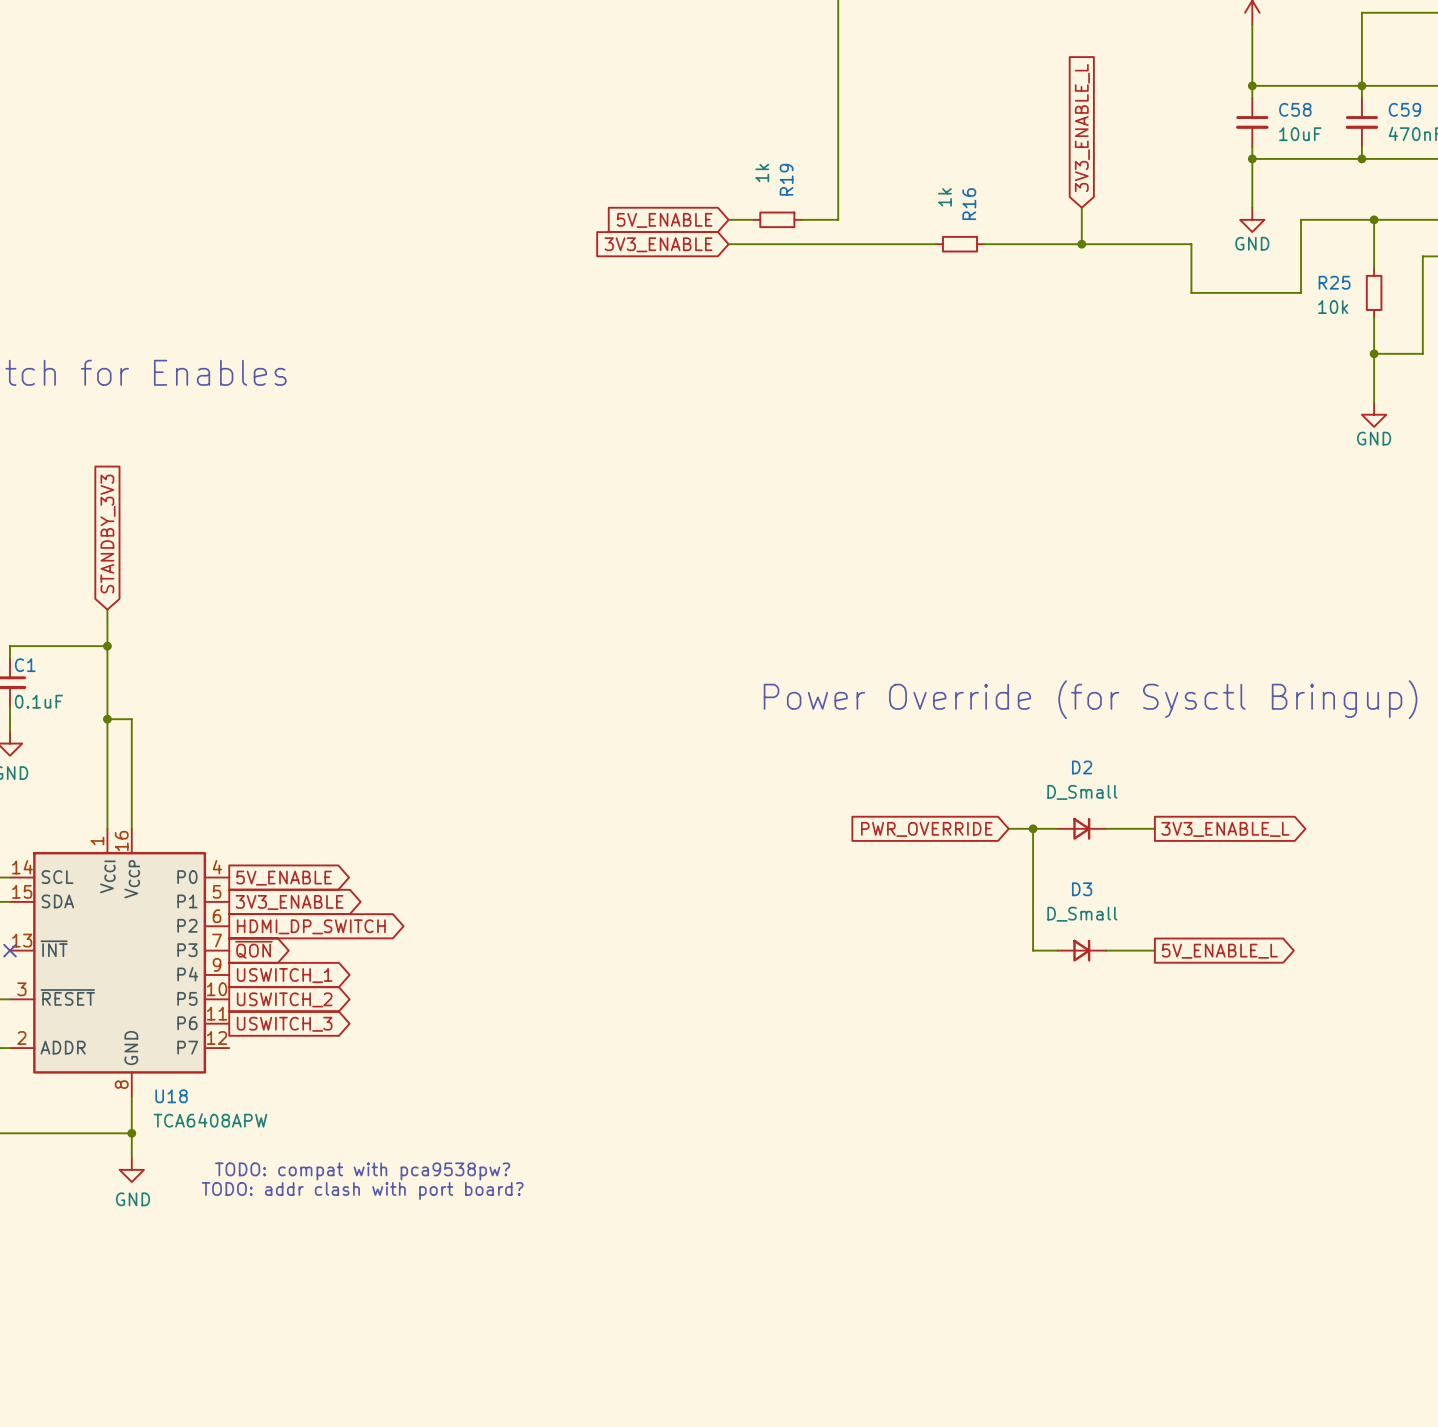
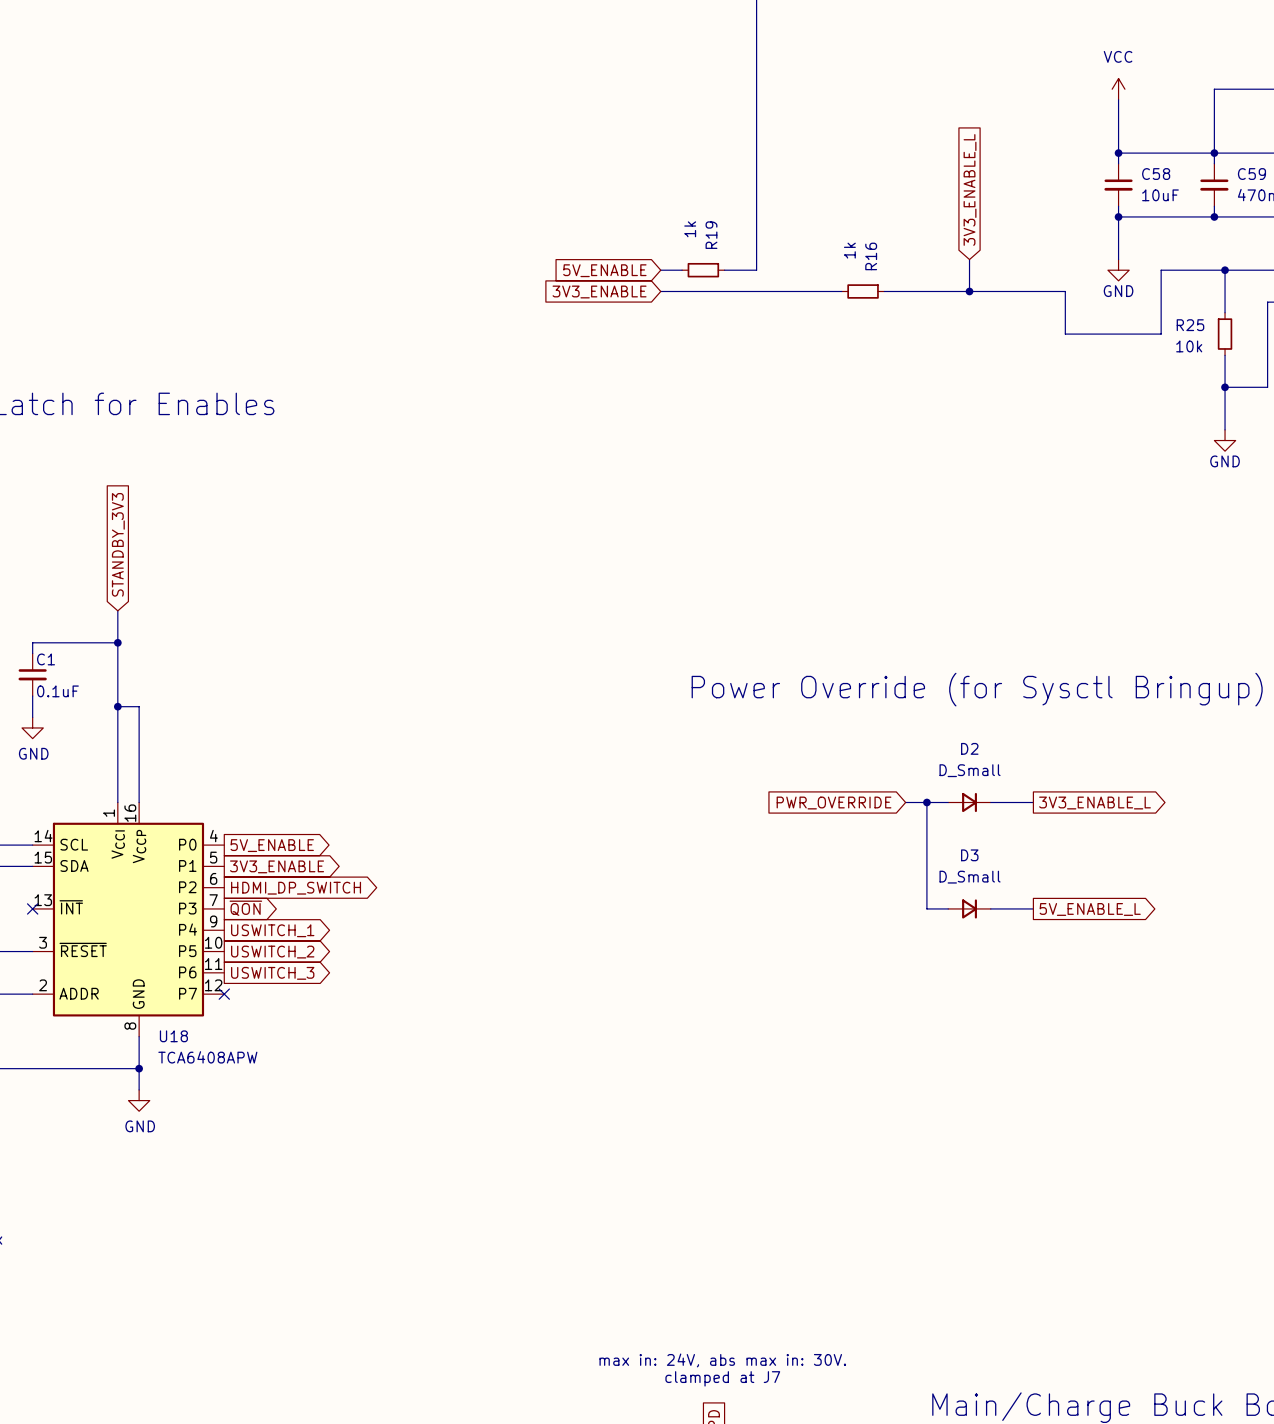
no-connect mark: none -> (224, 994)
text: TODO: compat with pca9538pw? (362, 1171) -> none
text: TODO: addr clash with port board? (362, 1191) -> none

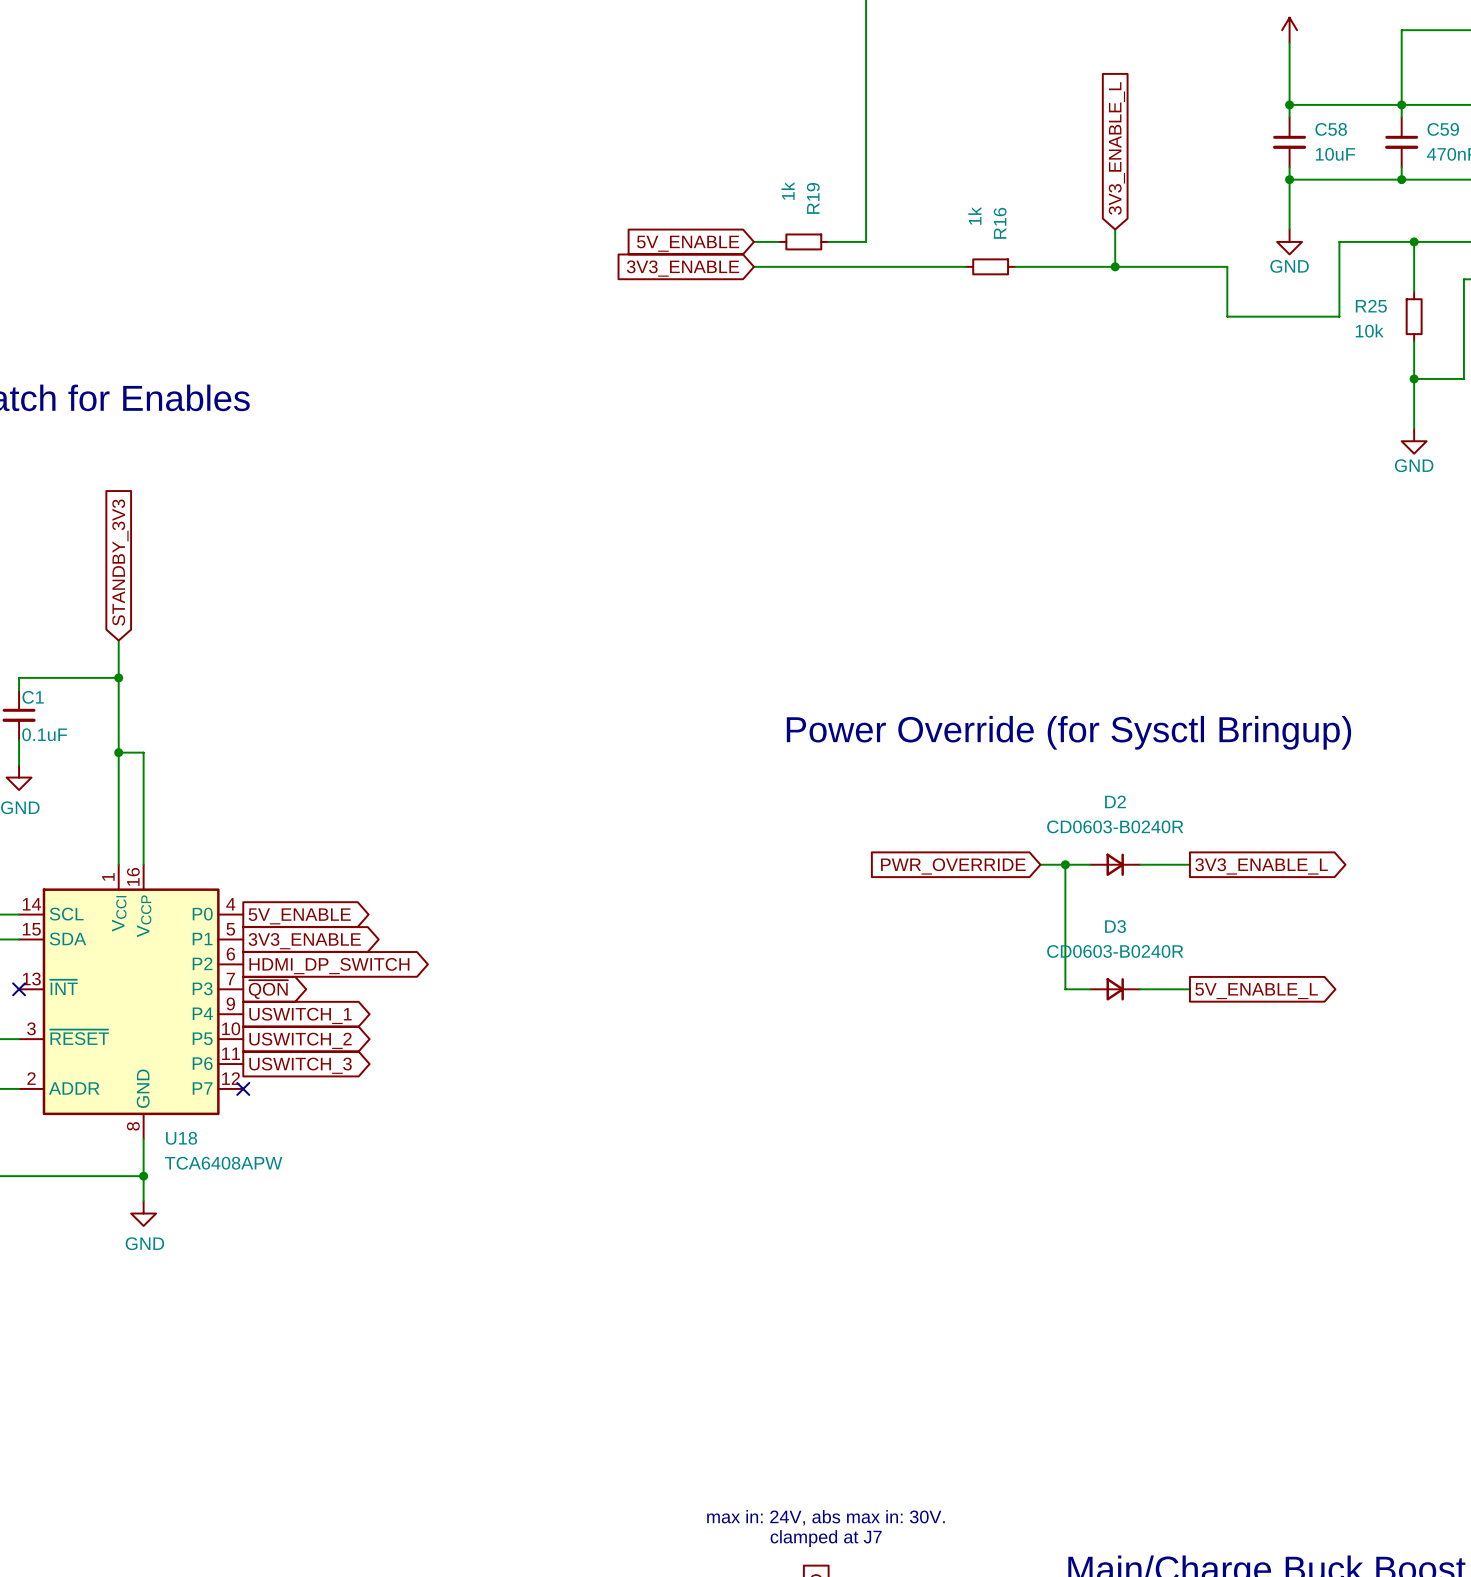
D2 value: D_Small (970, 770) -> CD0603-B0240R (1115, 826)
D3 value: D_Small (970, 877) -> CD0603-B0240R (1115, 951)

